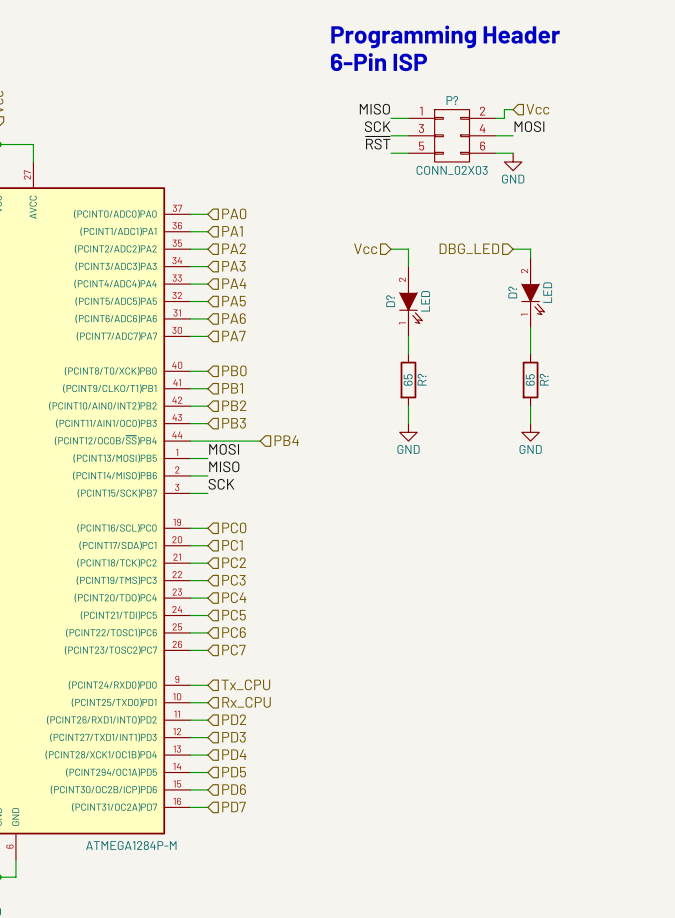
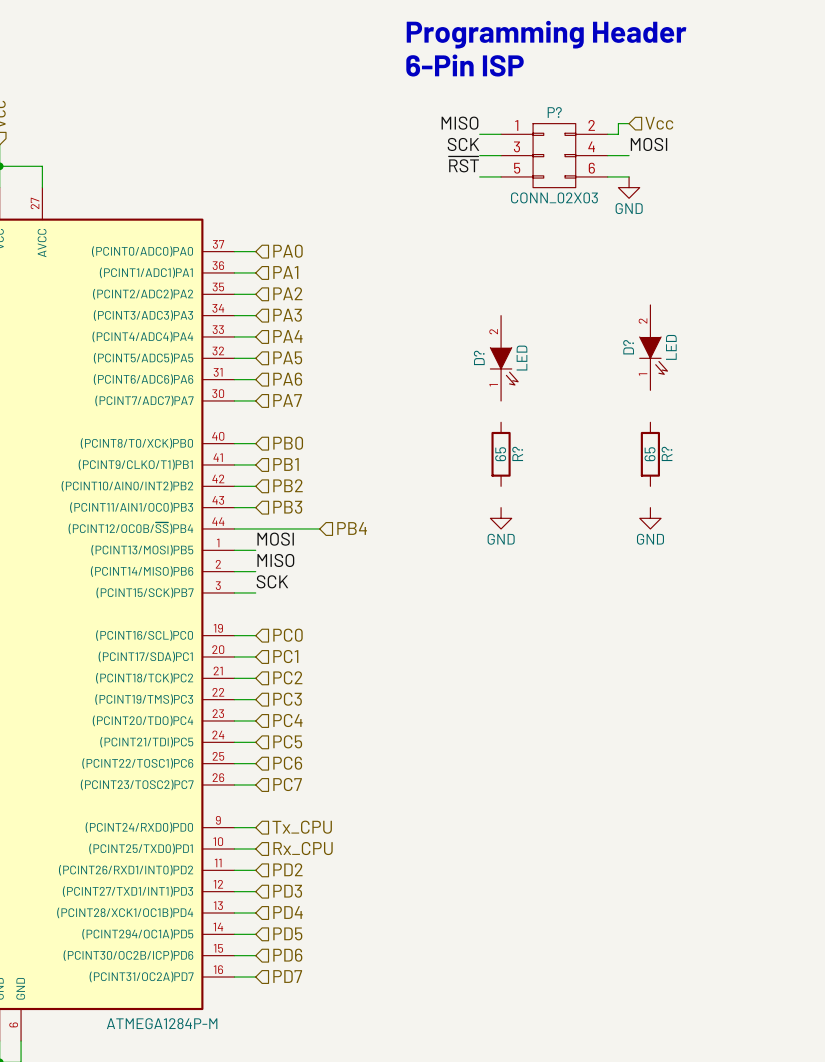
hierarchical label: Vcc (365, 248) -> none
hierarchical label: DBG_LED (469, 248) -> none
wire: (391, 249) (408, 249) (408, 266) -> none
wire: (513, 249) (530, 249) (530, 257) -> none
wire: (530, 327) (530, 353) -> none
wire: (408, 336) (408, 353) -> none
wire: (408, 406) (408, 423) -> none
wire: (530, 406) (530, 423) -> none

